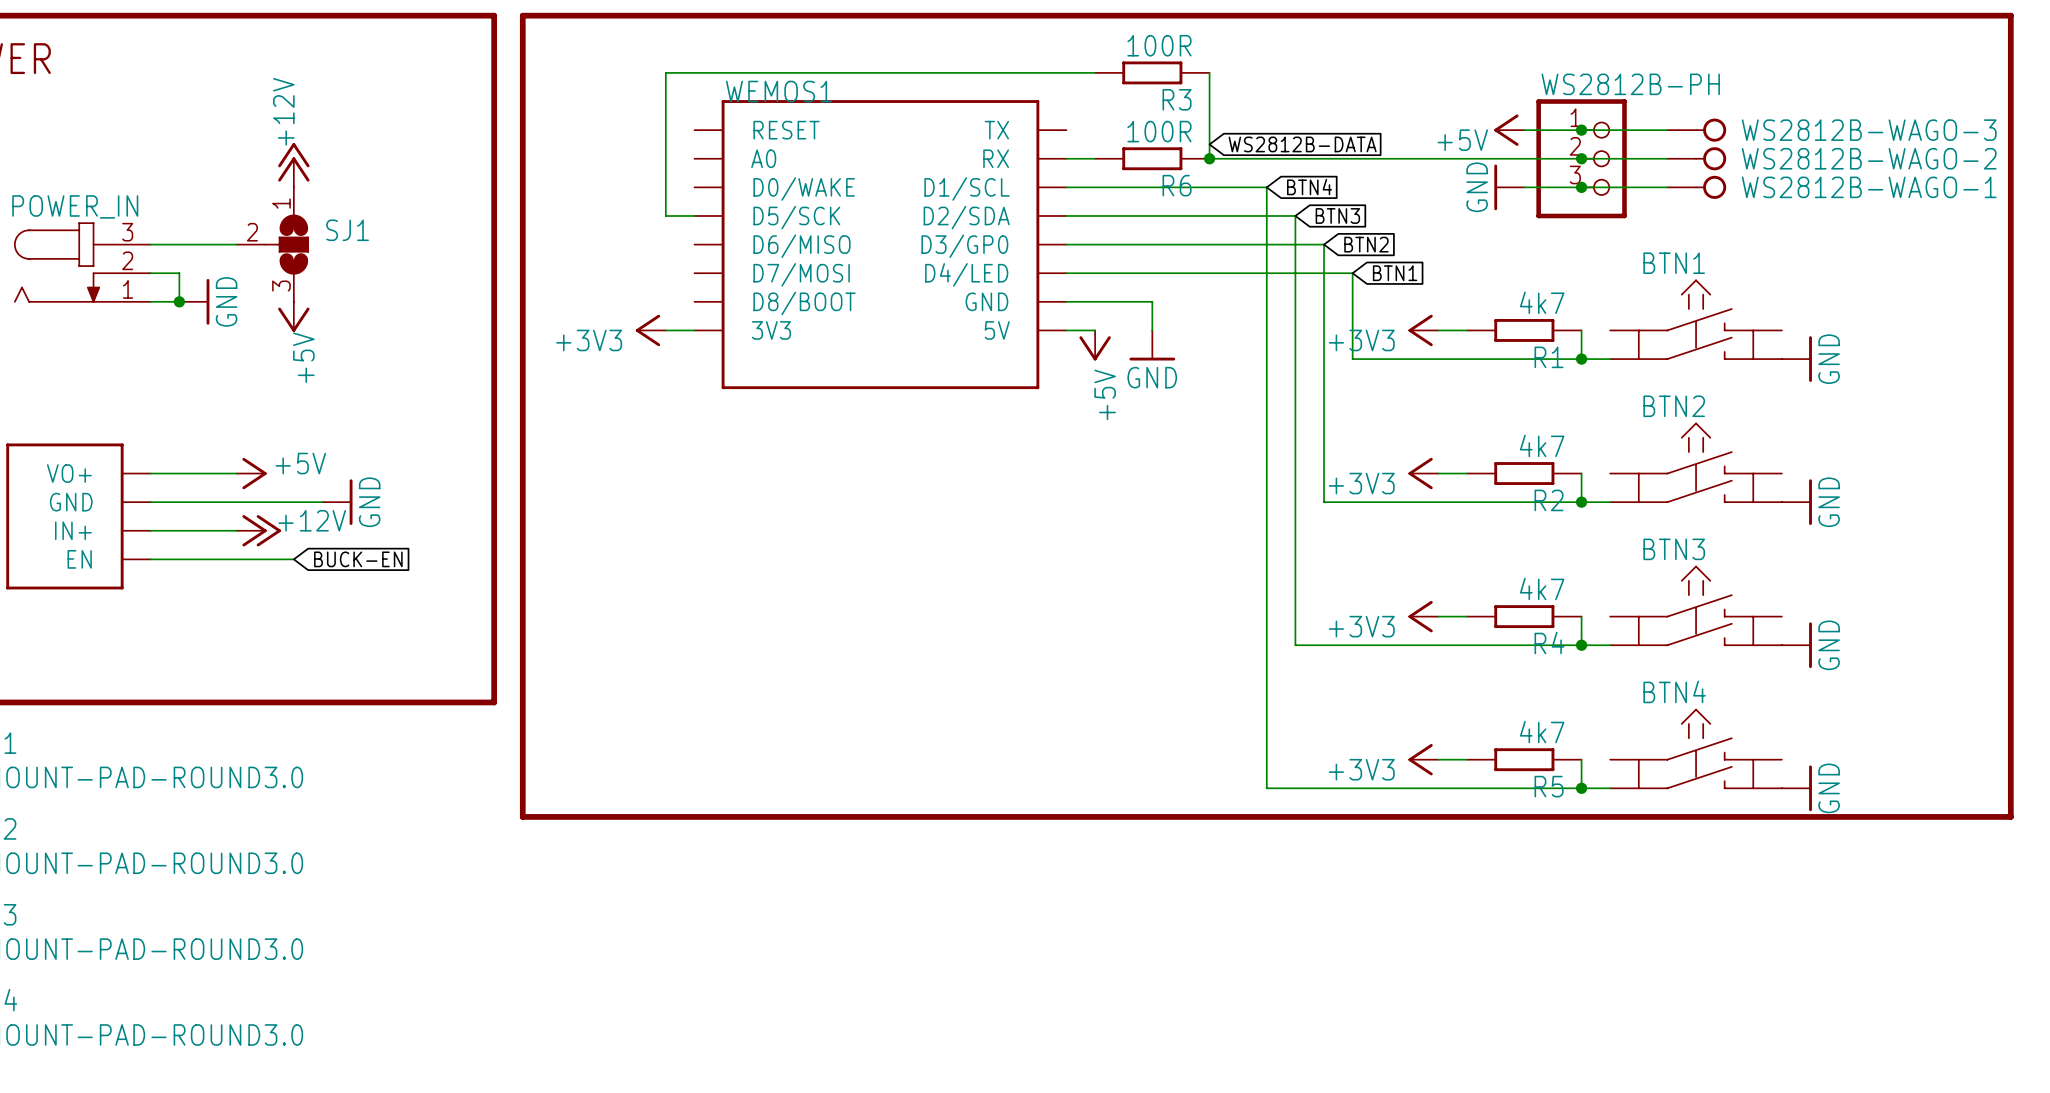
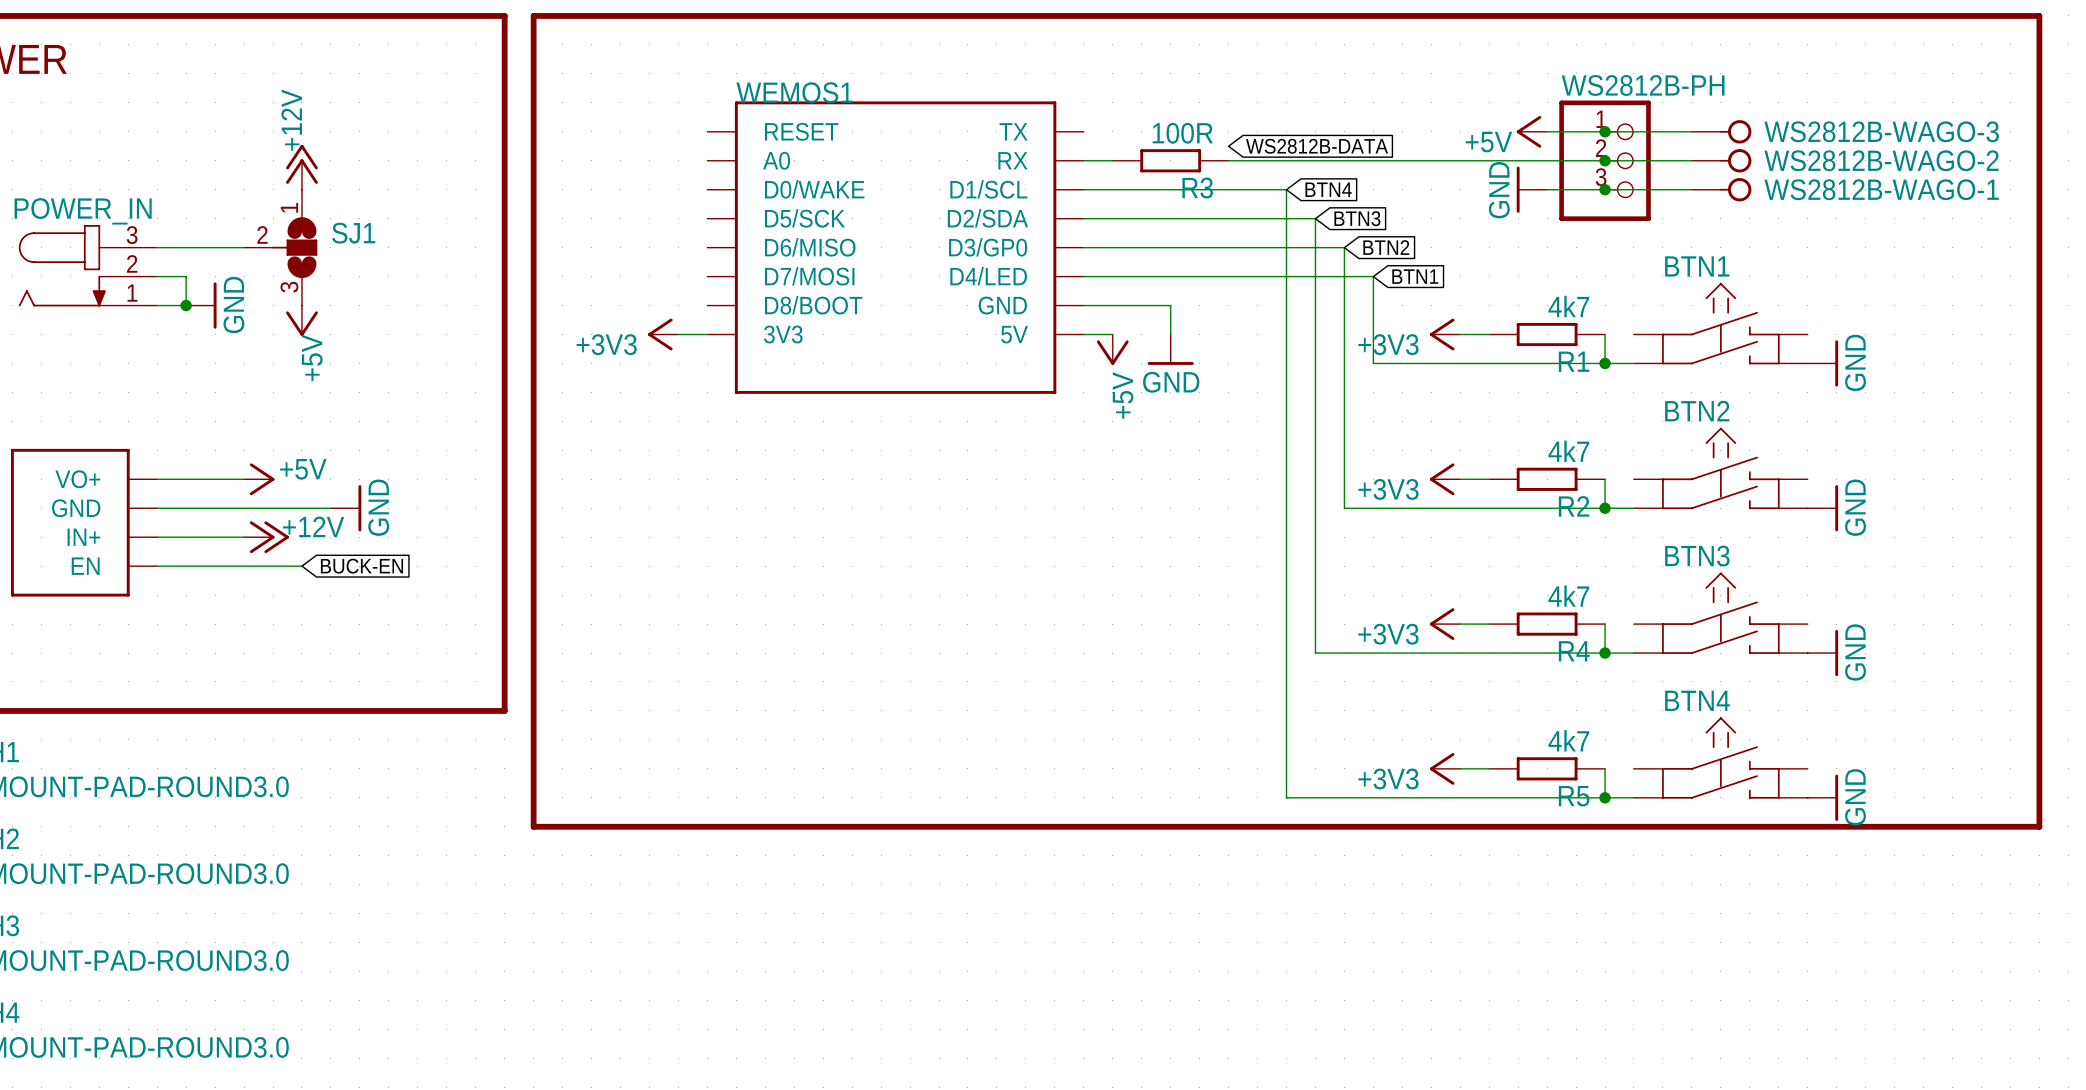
wire: (1095, 72) (665, 72) (665, 215) (694, 215) -> none
R3: 100R (1152, 72) -> none
wire: (1209, 72) (1209, 158) -> none
junction: (1209, 158) -> none
R6 name: R6 (1177, 185) -> R3 (1197, 187)

